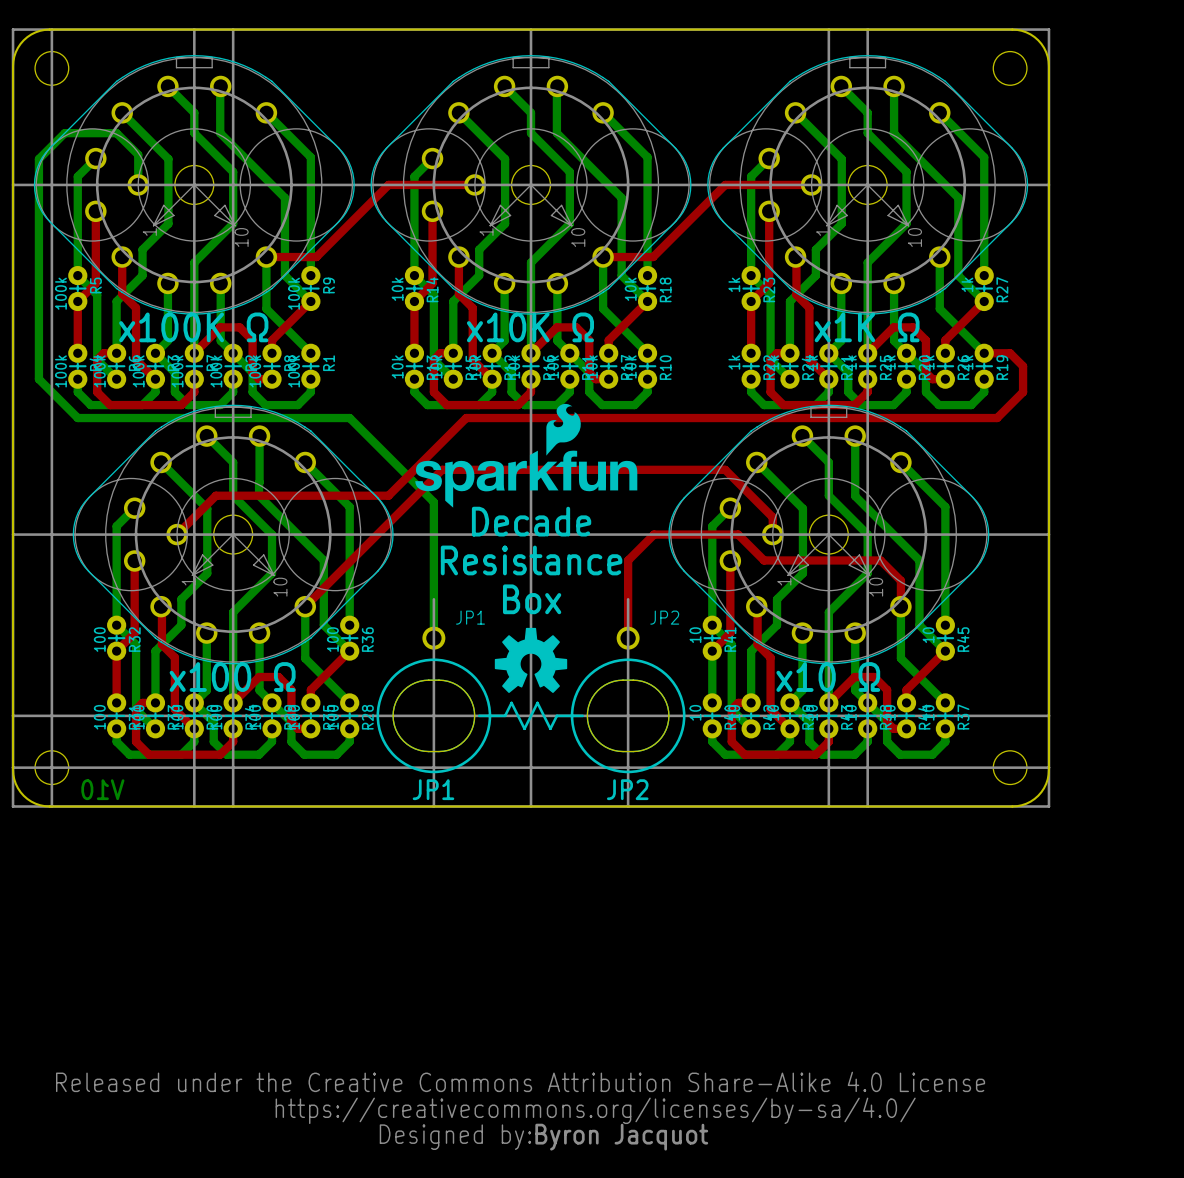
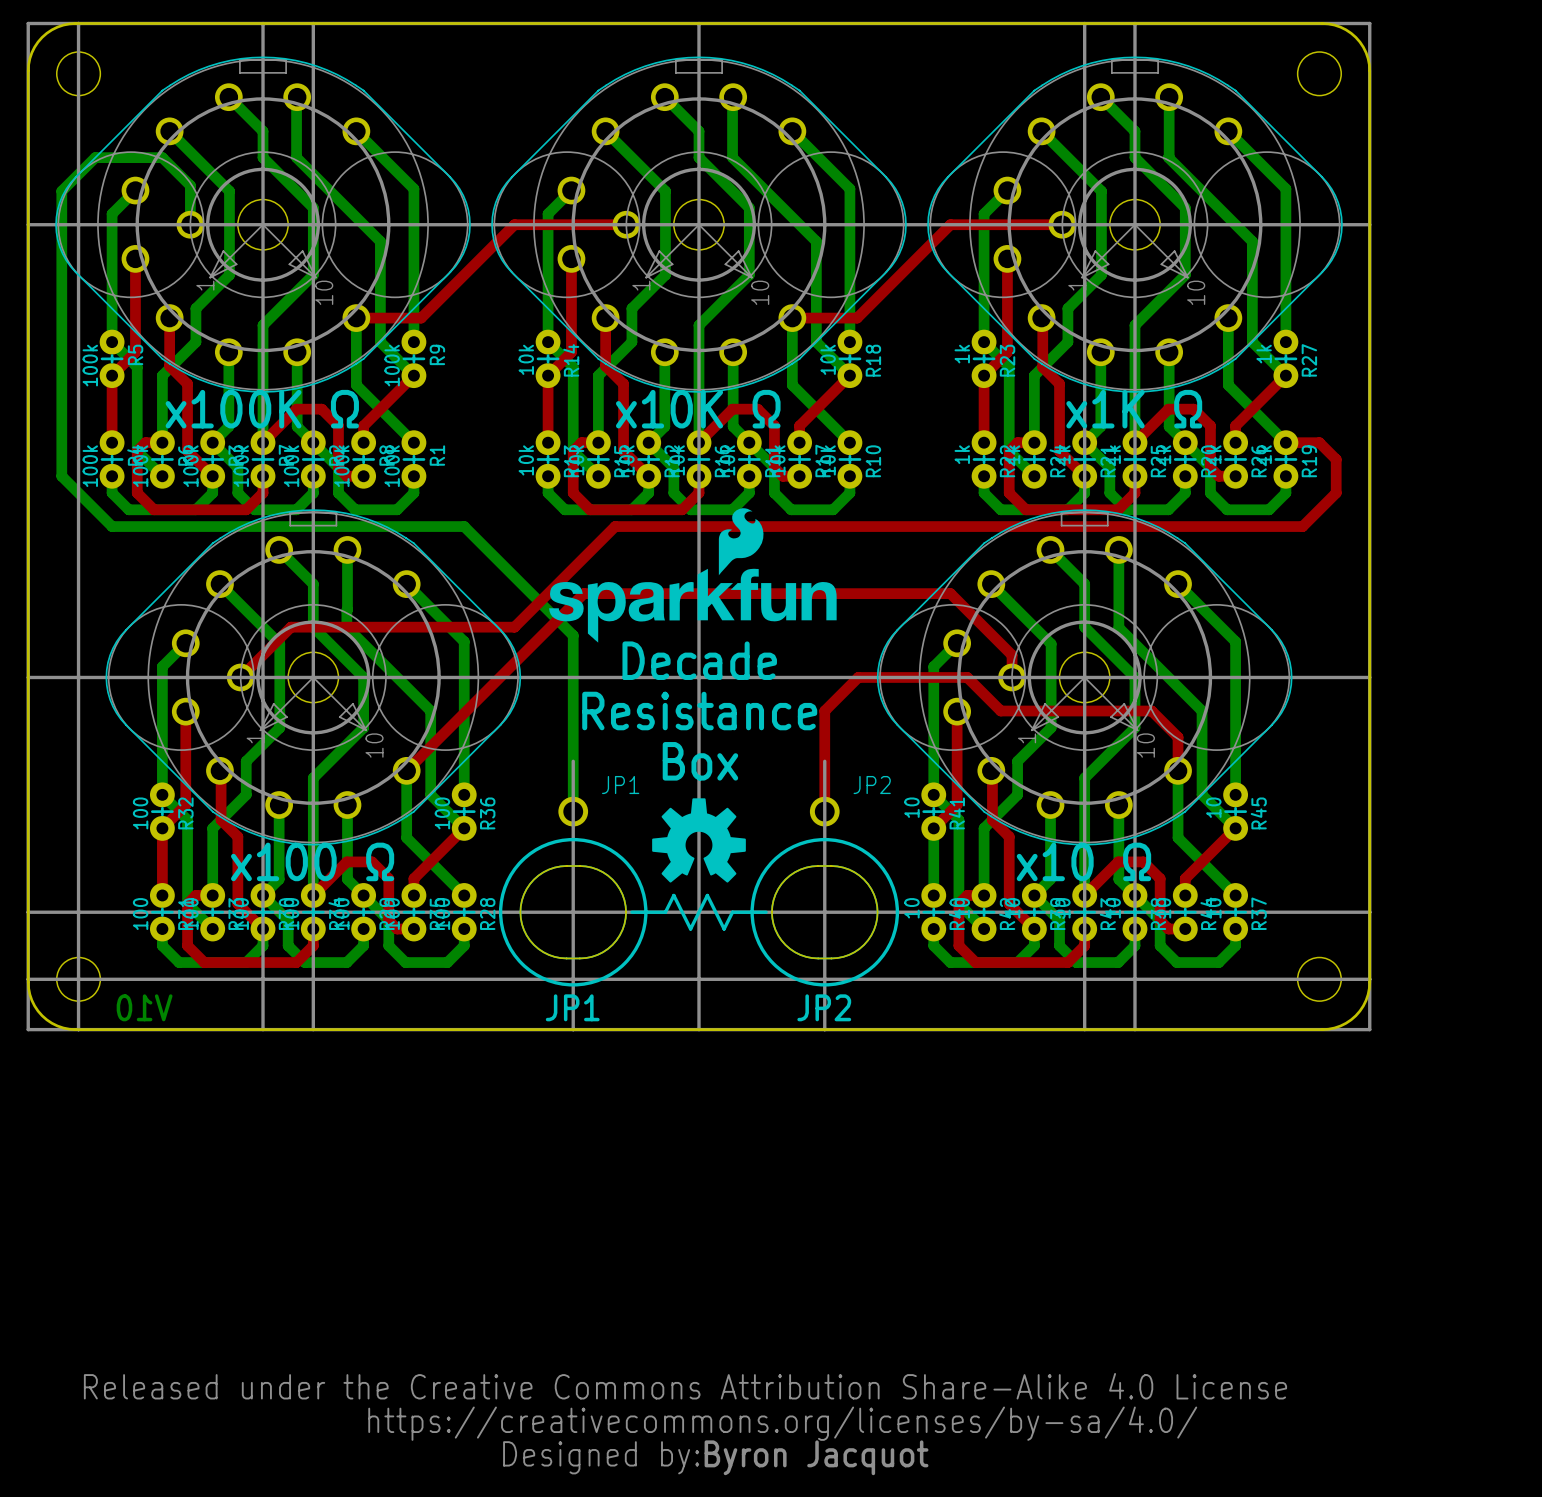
drawing: none -> [205, 167, 321, 282]
drawing: none -> [641, 167, 757, 282]
drawing: none -> [1077, 167, 1193, 282]
drawing: none -> [256, 620, 371, 735]
drawing: none -> [1027, 620, 1142, 735]

